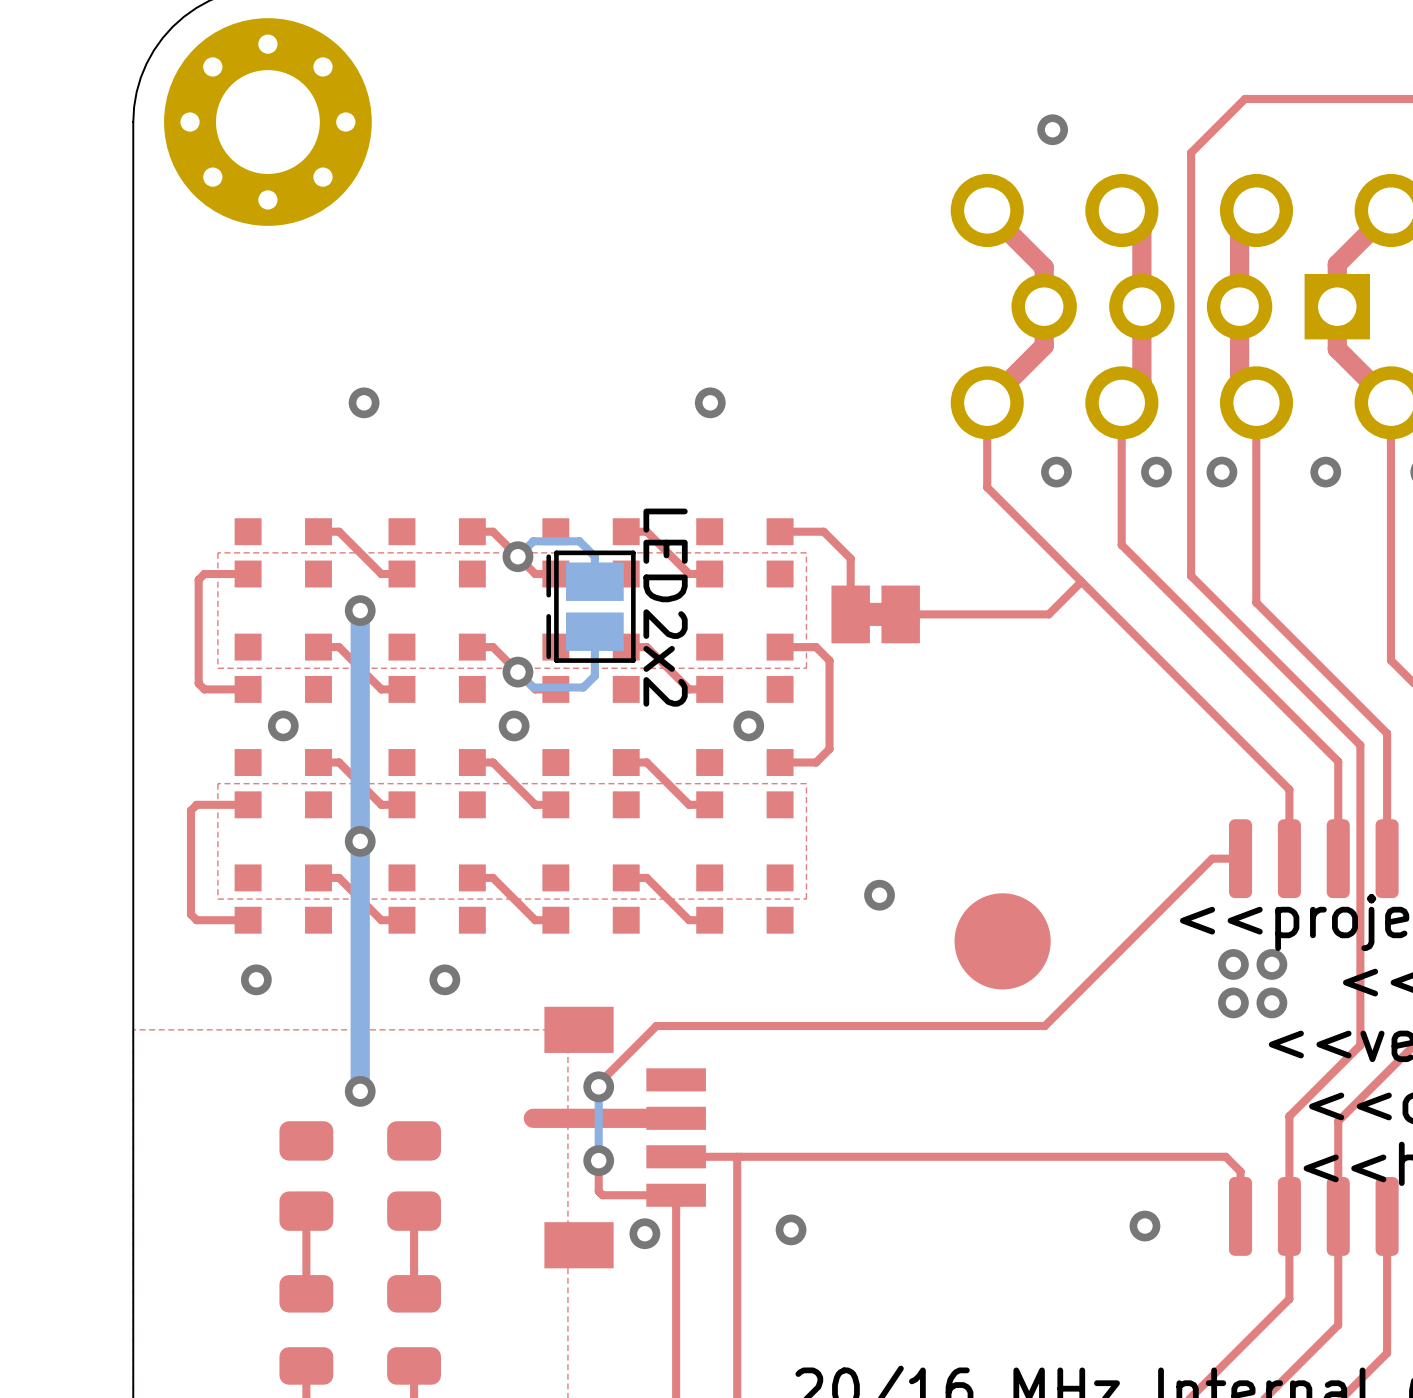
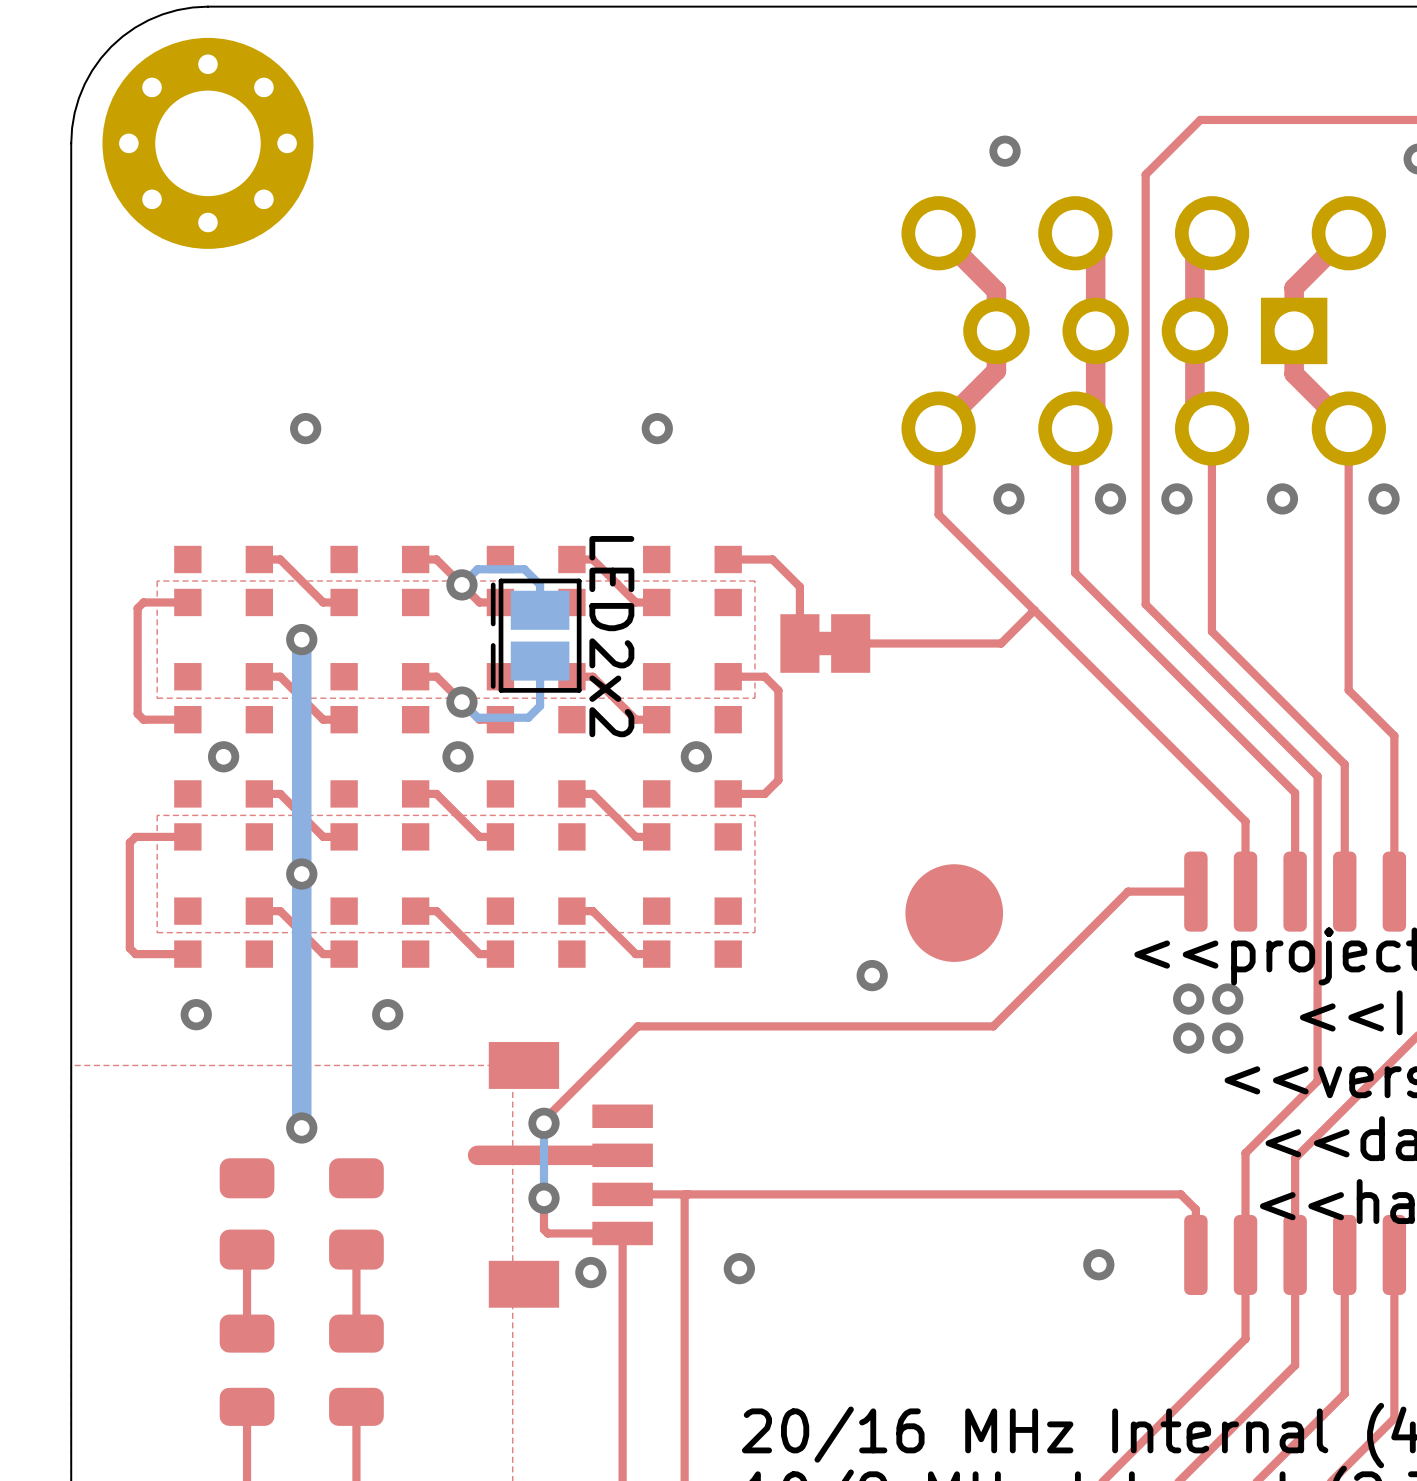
top track: (1212, 858) (1044, 1026) (656, 1026) -> (1167, 891) (1128, 891) (993, 1026) (637, 1026) (602, 1061)
via position: (879, 895) -> (872, 975)
part position: (1002, 941) -> (954, 913)

